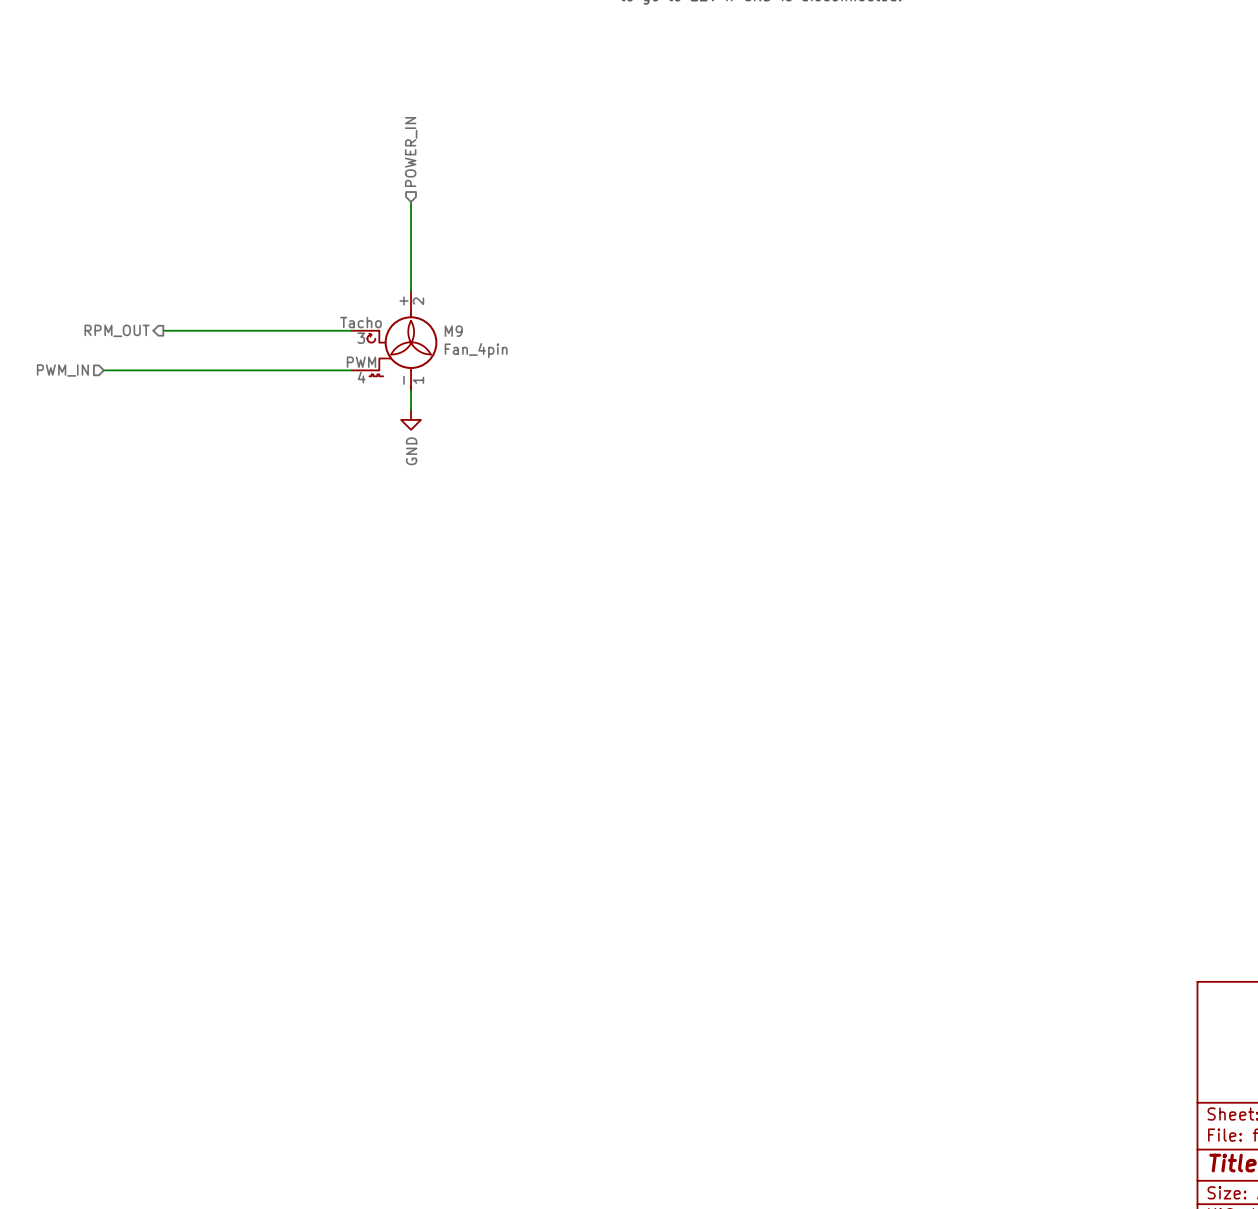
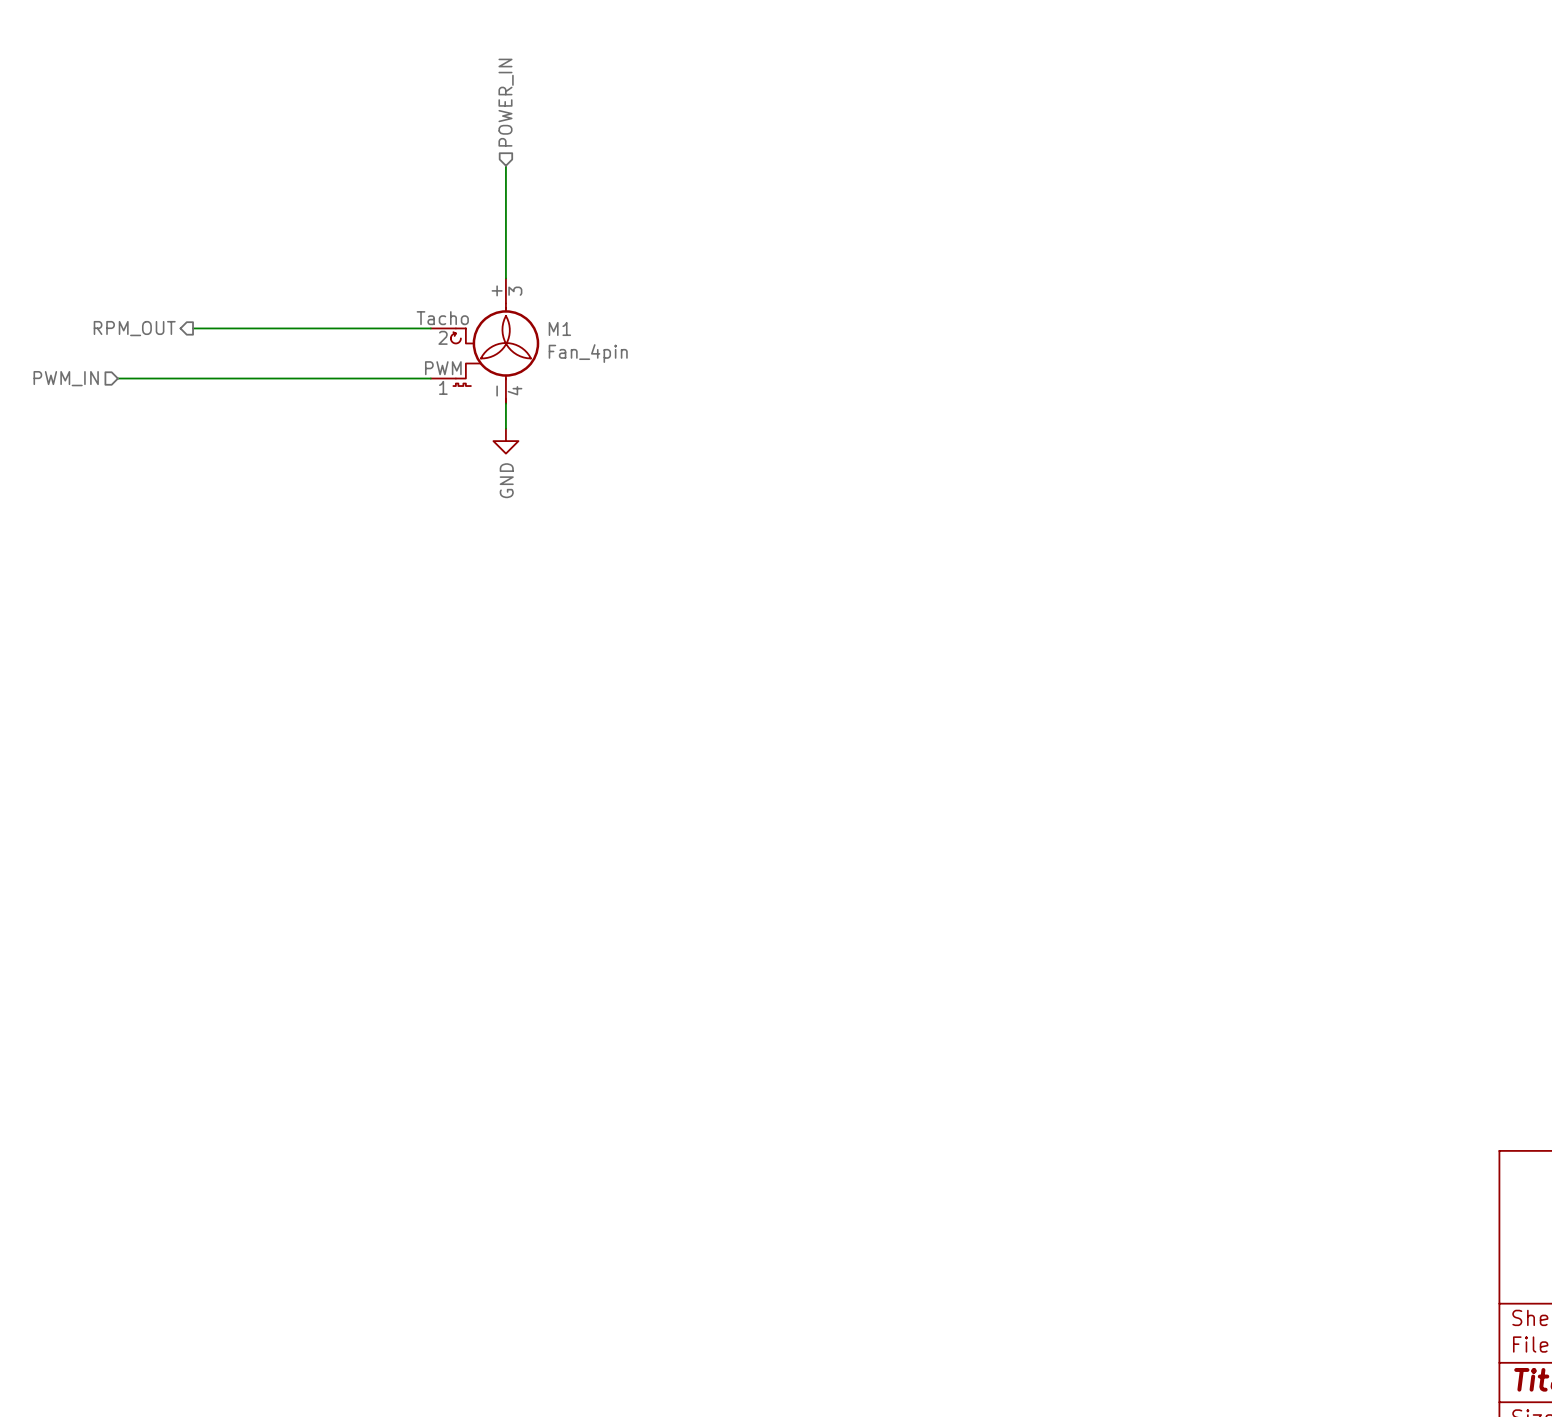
M9 pin number: 2 (418, 301) -> 3 (515, 291)
M9 name: M9 (453, 331) -> M1 (559, 328)
M9 pin number: 3 (361, 338) -> 2 (443, 337)
M9 pin number: 4 (361, 377) -> 1 (443, 387)
M9 pin number: 1 (418, 380) -> 4 (515, 390)

